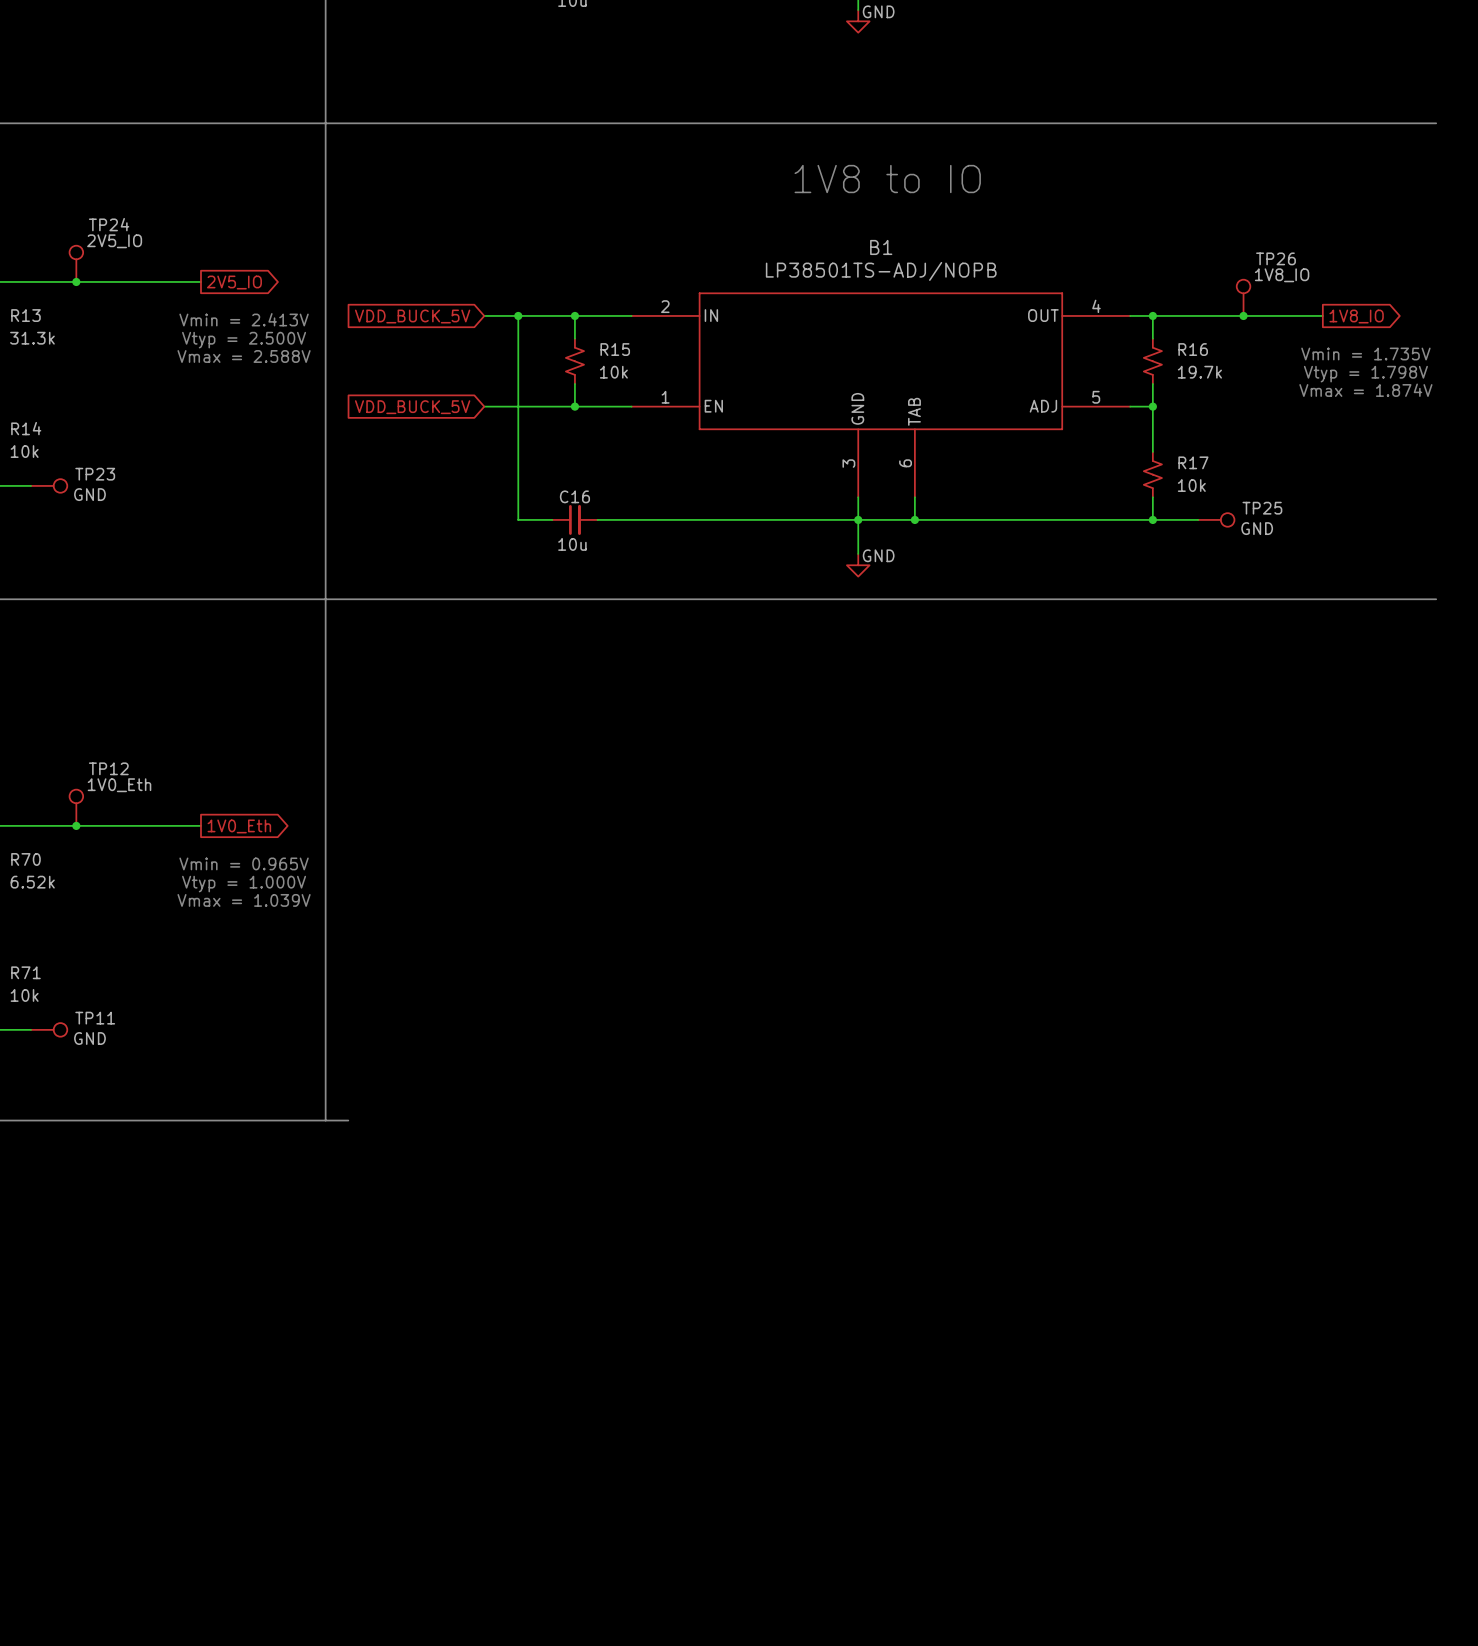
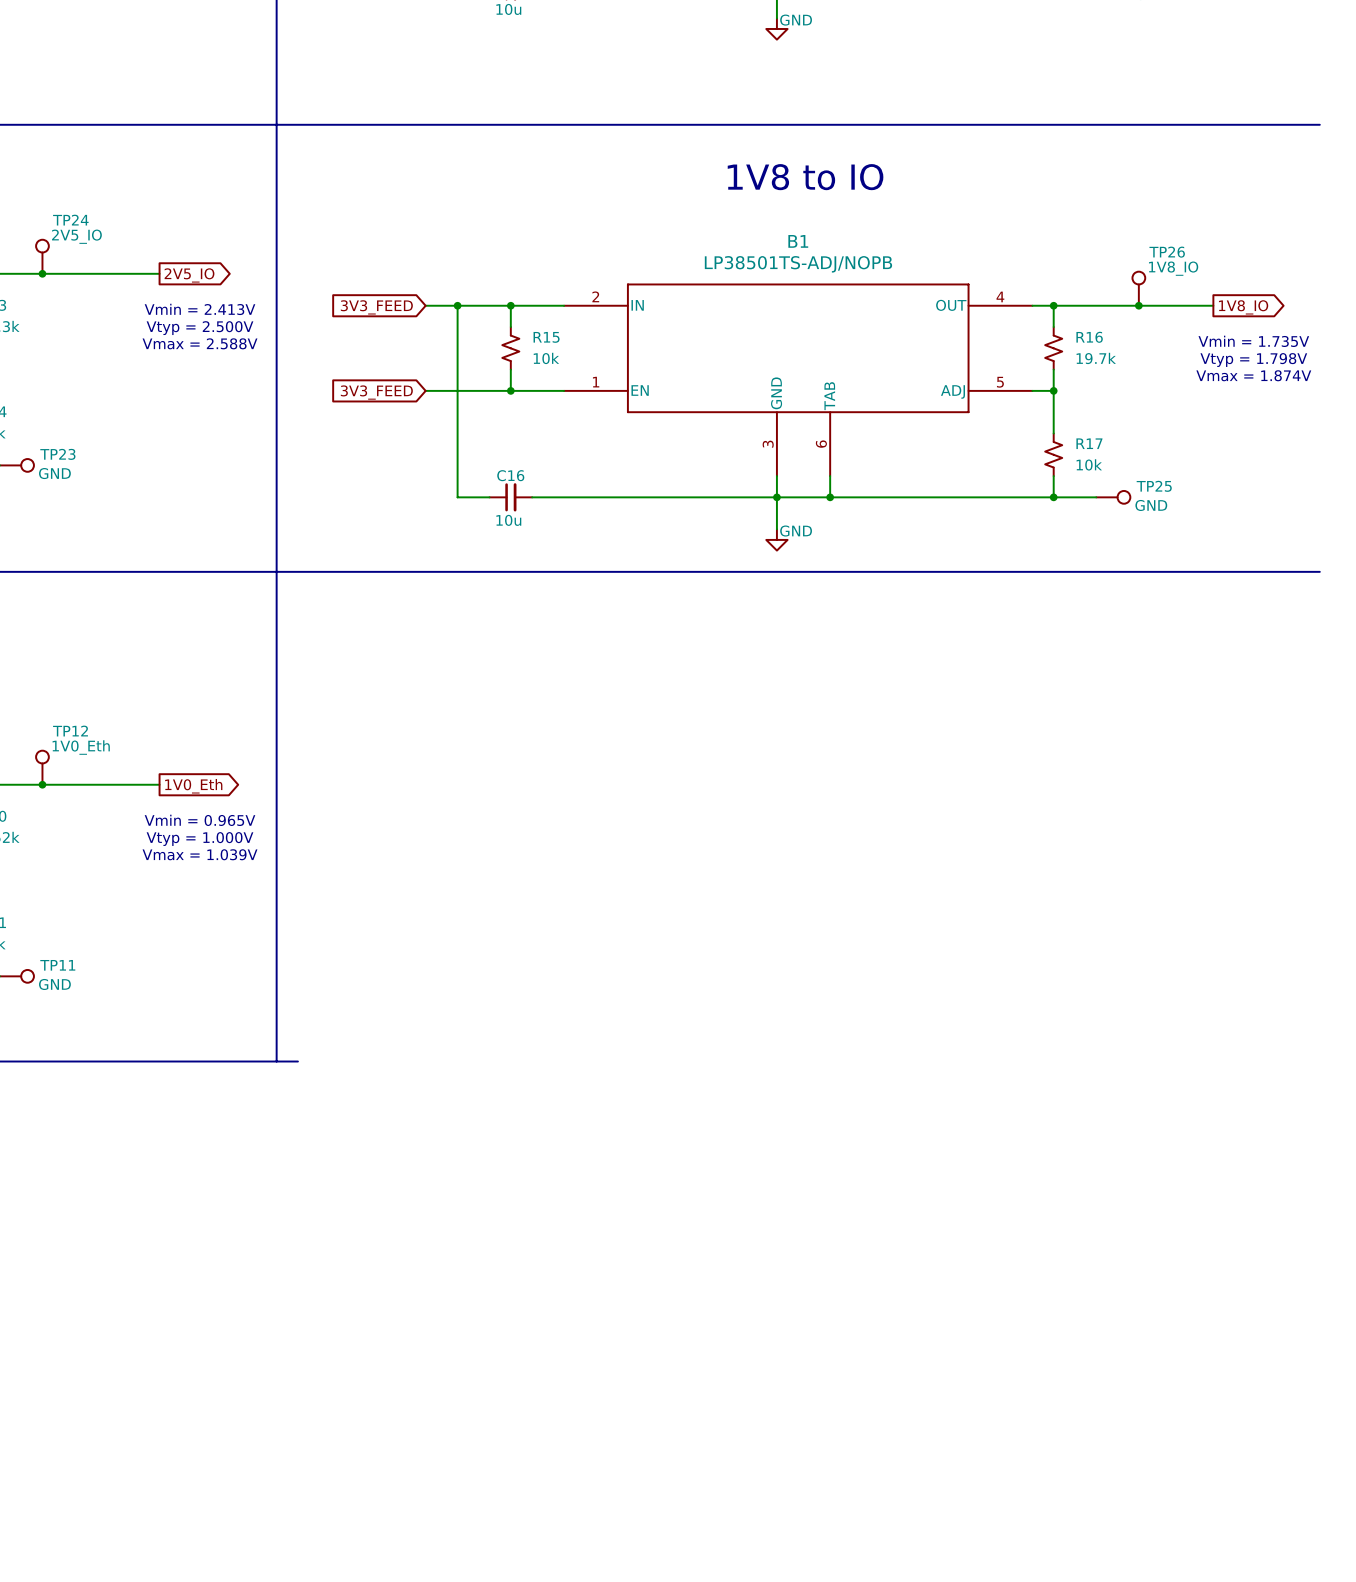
global label: VDD_BUCK_5V (412, 316) -> 3V3_FEED (376, 307)
global label: VDD_BUCK_5V (412, 407) -> 3V3_FEED (376, 392)

